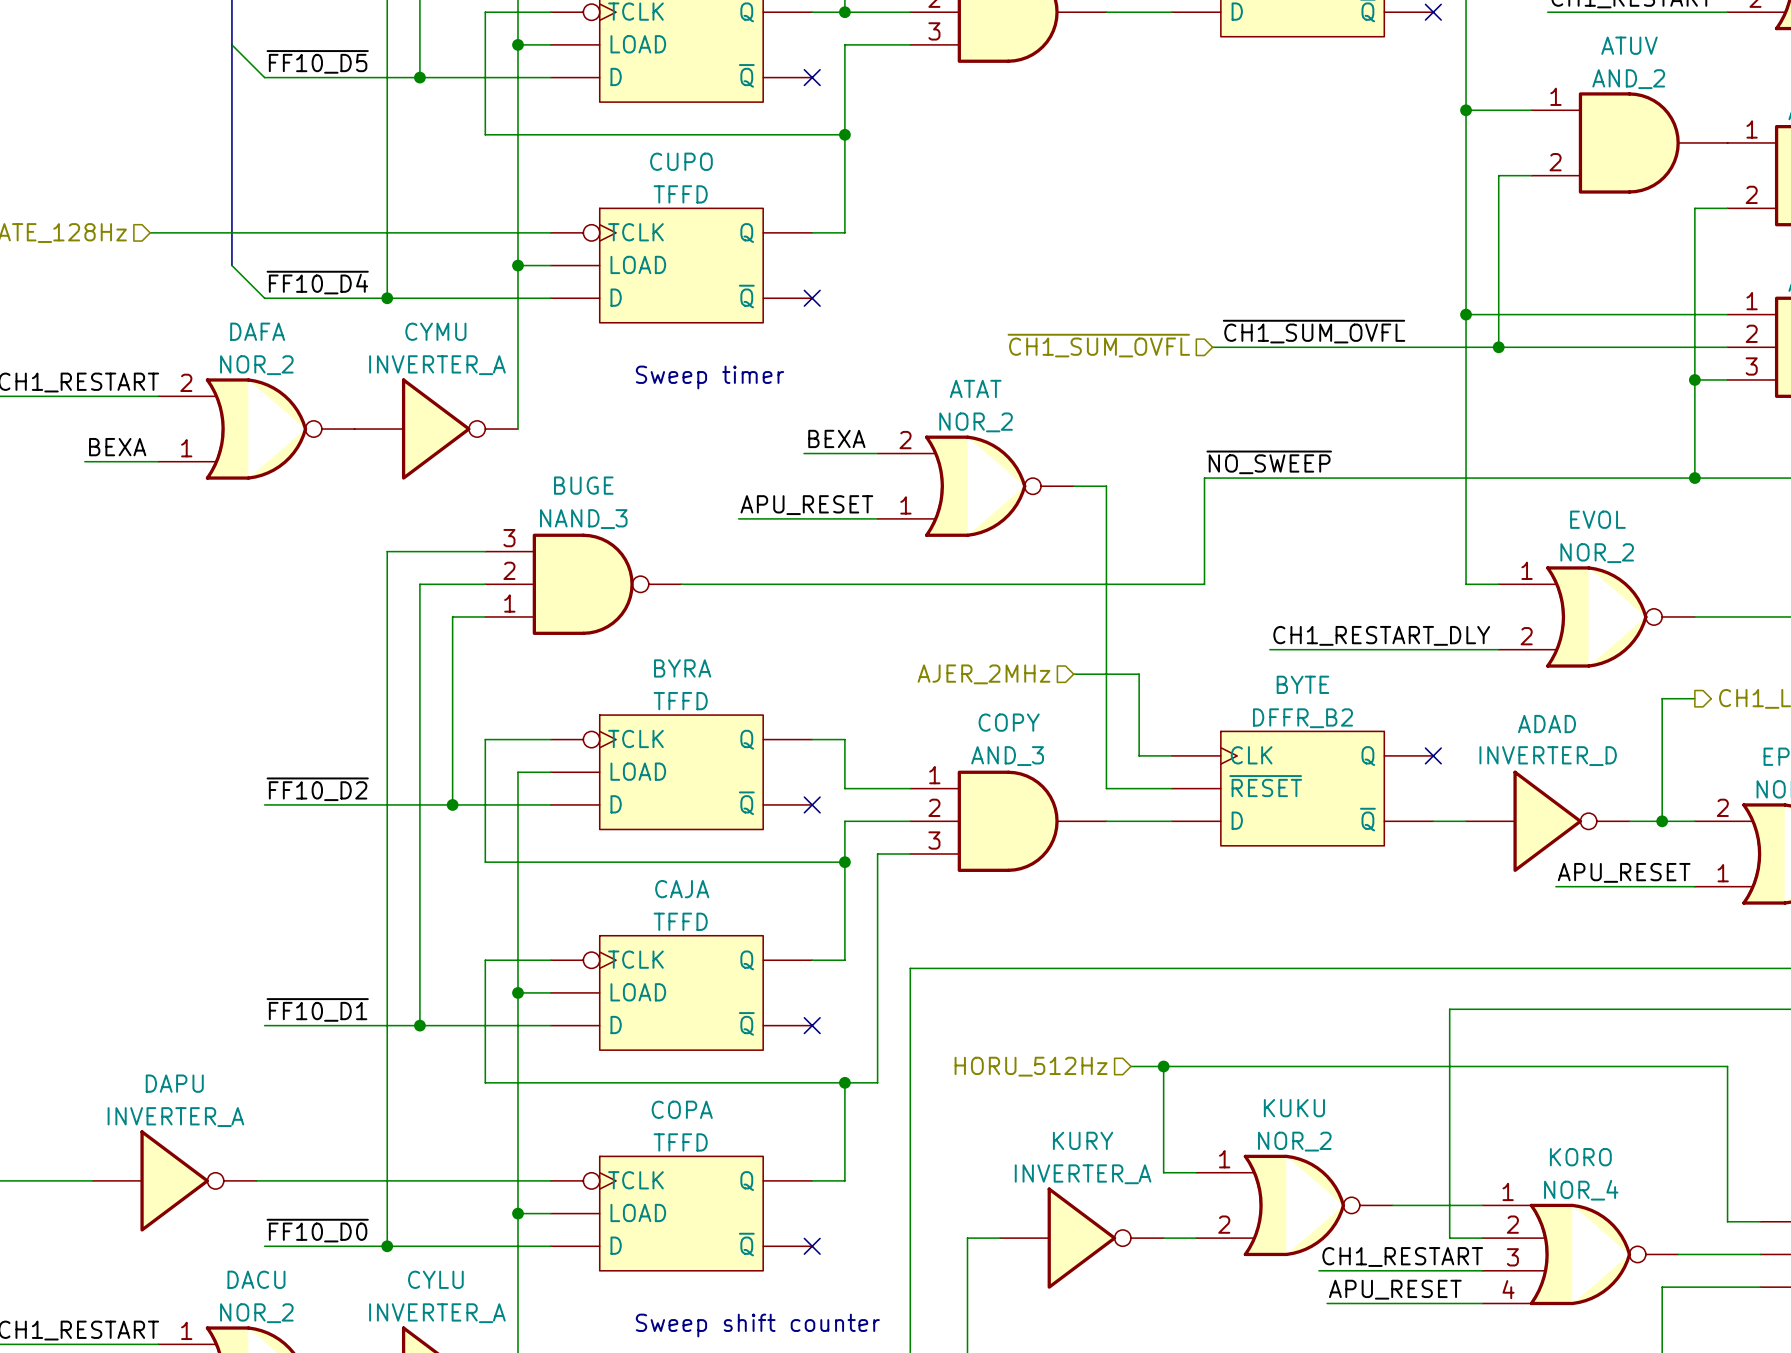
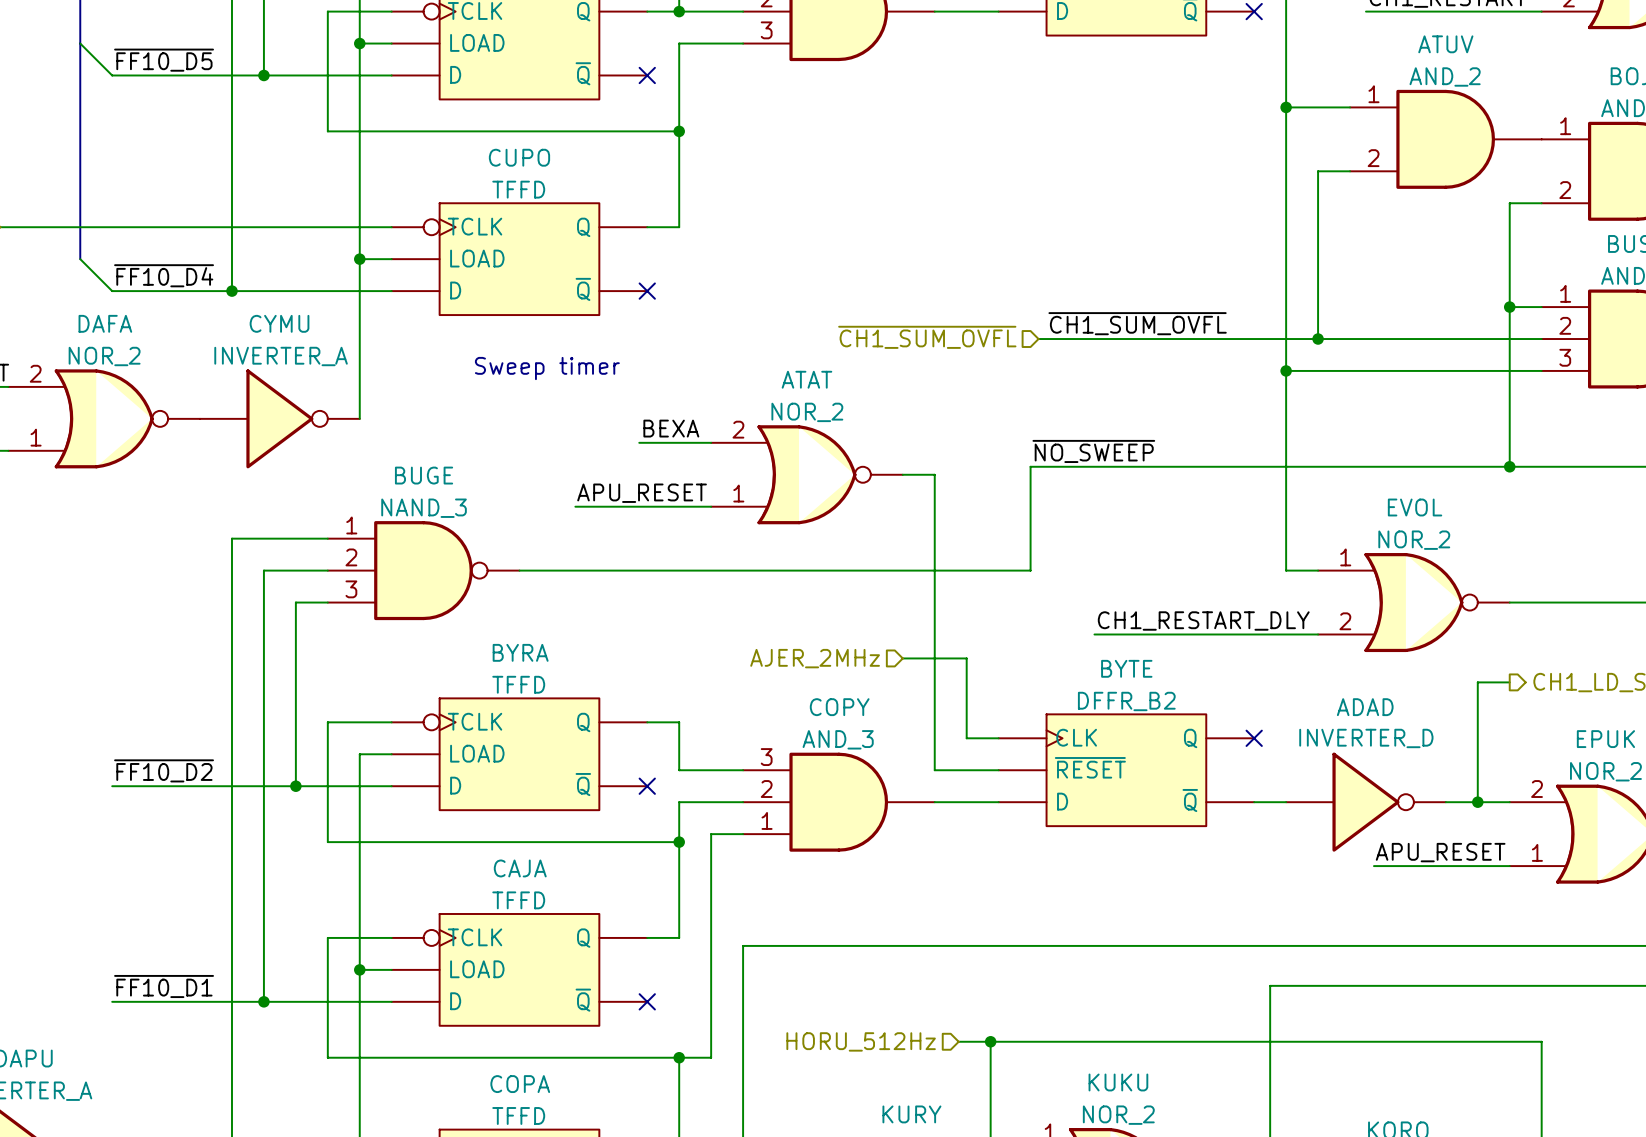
wire: (1466, 314) (1694, 314) -> (1286, 370) (1509, 370)
junction position: (1466, 314) -> (1286, 370)
junction position: (1694, 379) -> (1509, 307)
BUGE flip: as is (583, 584) -> up-down (423, 570)
COPY flip: as is (1008, 821) -> up-down (838, 802)

